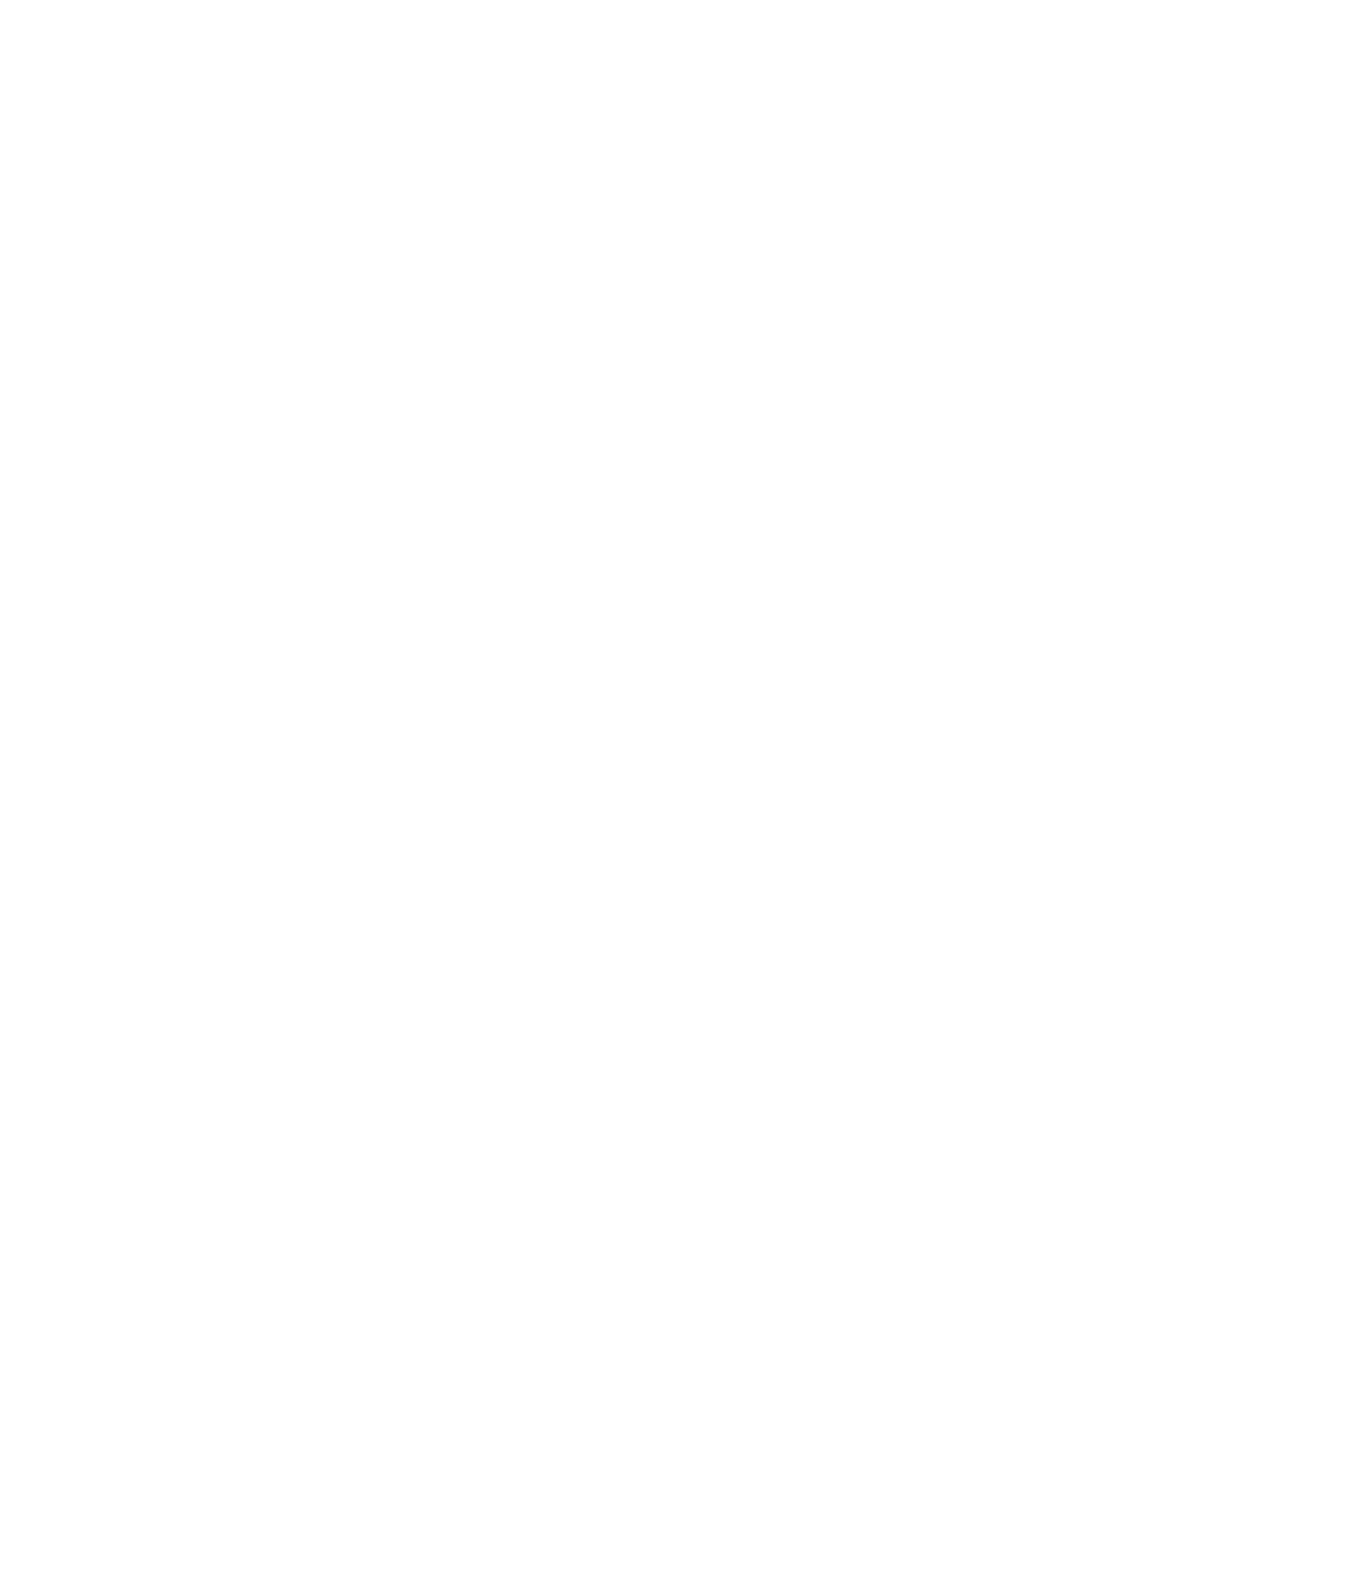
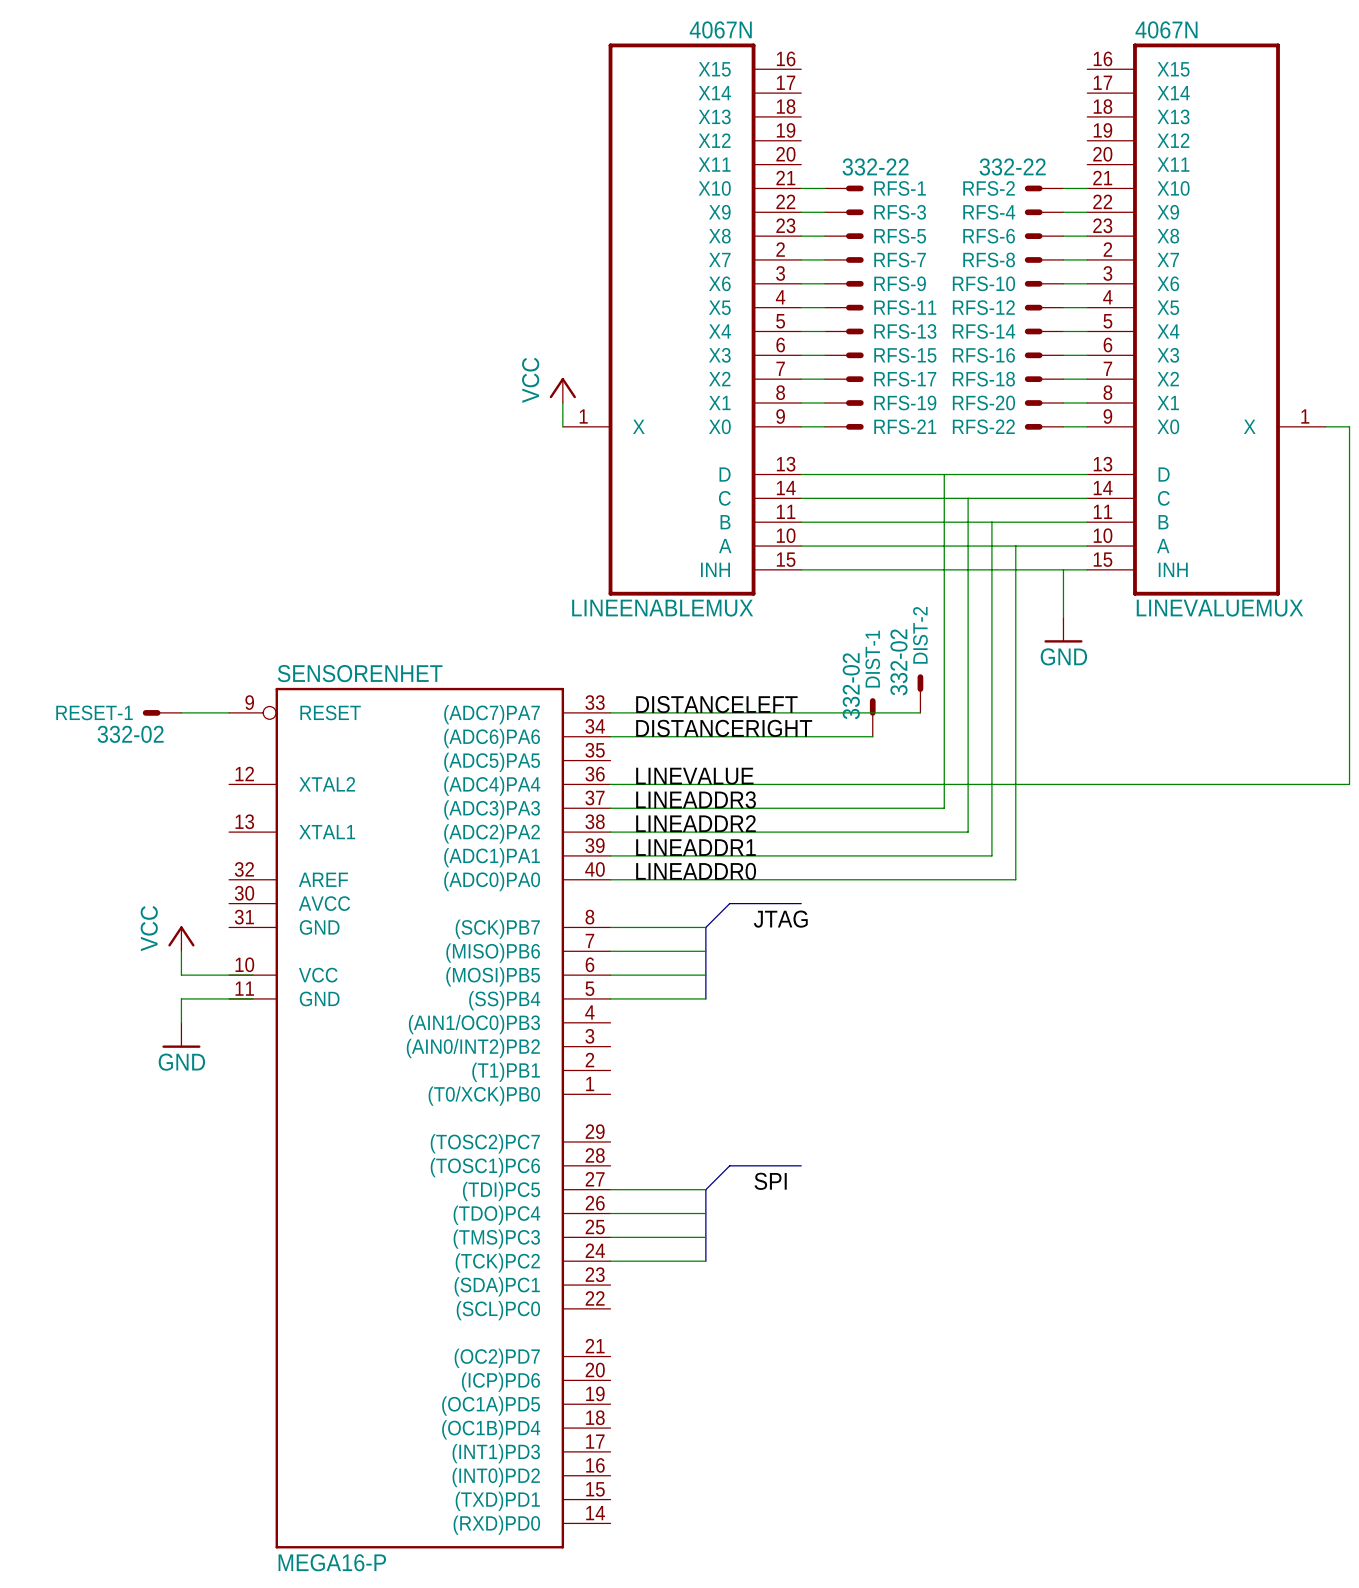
wire: none -> (801, 188) (825, 188)
RFS-1: none -> 332-22 (844, 188)
RFS-2: none -> 332-22 (1044, 188)
wire: none -> (1063, 188) (1087, 188)
wire: none -> (801, 212) (825, 212)
RFS-3: none -> (844, 212)
RFS-4: none -> (1044, 212)
wire: none -> (1063, 212) (1087, 212)
wire: none -> (801, 236) (825, 236)
RFS-5: none -> (844, 236)
RFS-6: none -> (1044, 236)
wire: none -> (1063, 236) (1087, 236)
wire: none -> (801, 259) (825, 259)
RFS-7: none -> (844, 259)
RFS-8: none -> (1044, 259)
wire: none -> (1063, 259) (1087, 259)
wire: none -> (801, 283) (825, 283)
RFS-9: none -> (844, 283)
RFS-10: none -> (1044, 283)
wire: none -> (1063, 283) (1087, 283)
wire: none -> (801, 307) (825, 307)
RFS-11: none -> (844, 307)
RFS-12: none -> (1044, 307)
wire: none -> (1063, 307) (1087, 307)
LINEENABLEMUX: none -> 4067N (682, 319)
LINEVALUEMUX: none -> 4067N (1206, 319)
wire: none -> (801, 331) (825, 331)
RFS-13: none -> (844, 331)
RFS-14: none -> (1044, 331)
wire: none -> (1063, 331) (1087, 331)
wire: none -> (801, 355) (825, 355)
RFS-15: none -> (844, 355)
RFS-16: none -> (1044, 355)
wire: none -> (1063, 355) (1087, 355)
wire: none -> (801, 379) (825, 379)
RFS-17: none -> (844, 379)
RFS-18: none -> (1044, 379)
wire: none -> (1063, 379) (1087, 379)
power symbol: none -> VCC (562, 390)
wire: none -> (562, 403) (562, 426)
wire: none -> (801, 403) (825, 403)
RFS-19: none -> (844, 403)
RFS-20: none -> (1044, 403)
wire: none -> (1063, 403) (1087, 403)
wire: none -> (801, 426) (825, 426)
RFS-21: none -> (844, 426)
RFS-22: none -> (1044, 426)
wire: none -> (1063, 426) (1087, 426)
wire: none -> (1325, 426) (1349, 426) (1349, 784) (610, 784)
wire: none -> (801, 474) (1087, 474)
wire: none -> (944, 474) (944, 808) (610, 808)
wire: none -> (801, 498) (1087, 498)
wire: none -> (968, 498) (968, 832) (610, 832)
wire: none -> (801, 522) (1087, 522)
wire: none -> (991, 522) (991, 855) (610, 855)
wire: none -> (801, 546) (1087, 546)
wire: none -> (1015, 546) (1015, 879) (610, 879)
wire: none -> (801, 569) (1087, 569)
wire: none -> (1063, 569) (1063, 617)
power symbol: none -> GND (1063, 630)
DIST-2: none -> 332-02 (920, 693)
label: none -> DISTANCELEFT (716, 704)
RESET-1: none -> 332-02 (162, 712)
wire: none -> (181, 712) (229, 712)
wire: none -> (610, 712) (920, 712)
DIST-1: none -> 332-02 (872, 717)
label: none -> DISTANCERIGHT (724, 728)
wire: none -> (610, 736) (872, 736)
label: none -> LINEVALUE (694, 776)
label: none -> LINEADDR3 (696, 799)
label: none -> LINEADDR2 (695, 823)
label: none -> LINEADDR1 (695, 847)
label: none -> LINEADDR0 (696, 871)
bus: none -> (801, 903) (729, 903) (705, 927) (705, 998)
label: none -> JTAG (780, 919)
wire: none -> (610, 927) (705, 927)
power symbol: none -> VCC (181, 938)
wire: none -> (181, 951) (181, 975) (252, 975)
wire: none -> (610, 951) (705, 951)
wire: none -> (610, 975) (705, 975)
wire: none -> (252, 998) (181, 998) (181, 1022)
wire: none -> (610, 998) (705, 998)
power symbol: none -> GND (181, 1035)
SENSORENHET: none -> MEGA16-P (419, 1118)
bus: none -> (801, 1165) (729, 1165) (705, 1189) (705, 1261)
label: none -> SPI (770, 1181)
wire: none -> (610, 1189) (705, 1189)
wire: none -> (610, 1213) (705, 1213)
wire: none -> (610, 1237) (705, 1237)
wire: none -> (610, 1261) (705, 1261)

